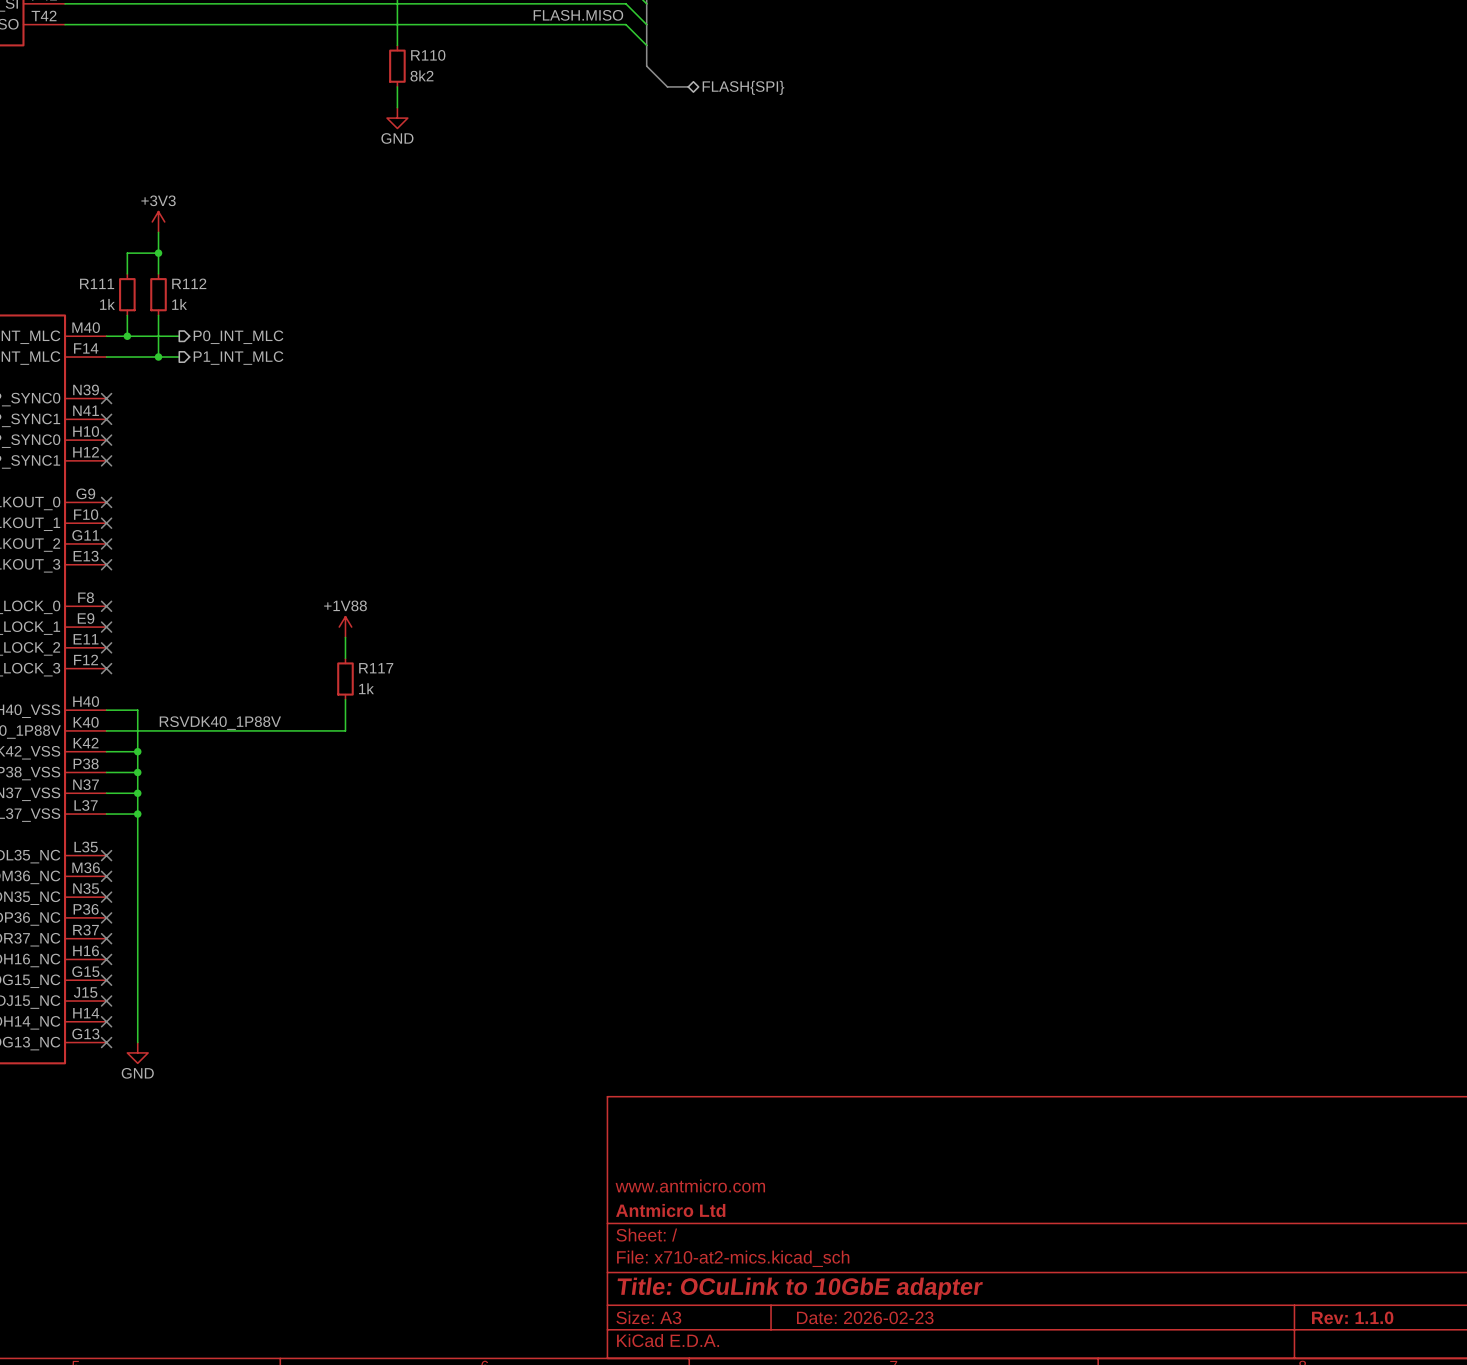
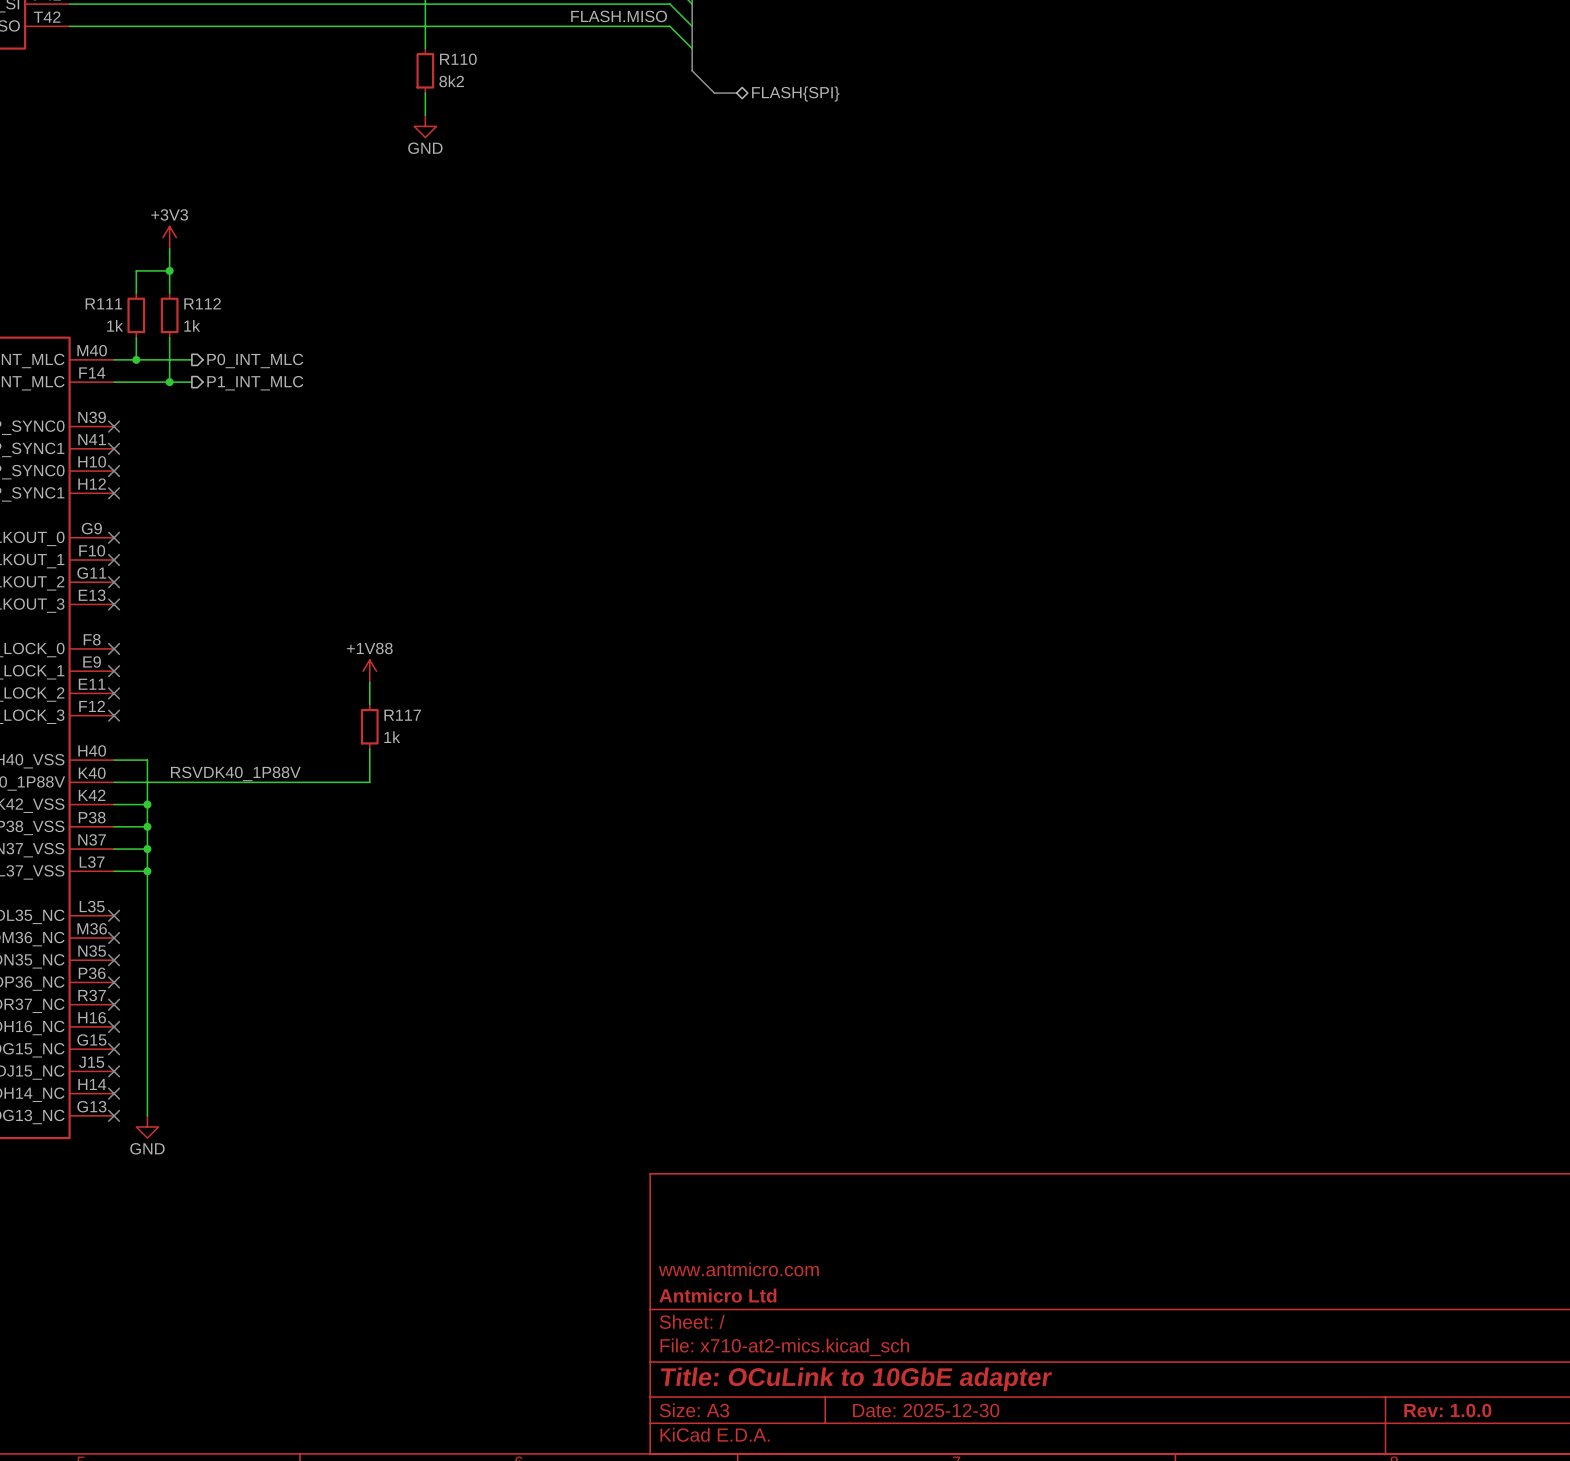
title block: Date: 2026-02-23 (865, 1317) -> Date: 2025-12-30 (926, 1410)
title block: Rev: 1.1.0 (1352, 1317) -> Rev: 1.0.0 (1447, 1410)

